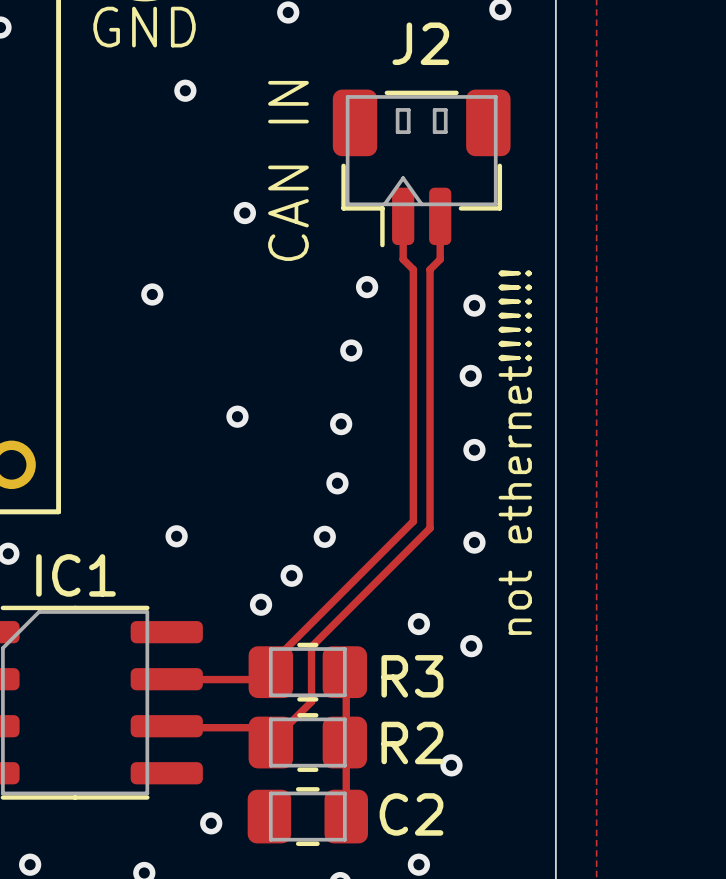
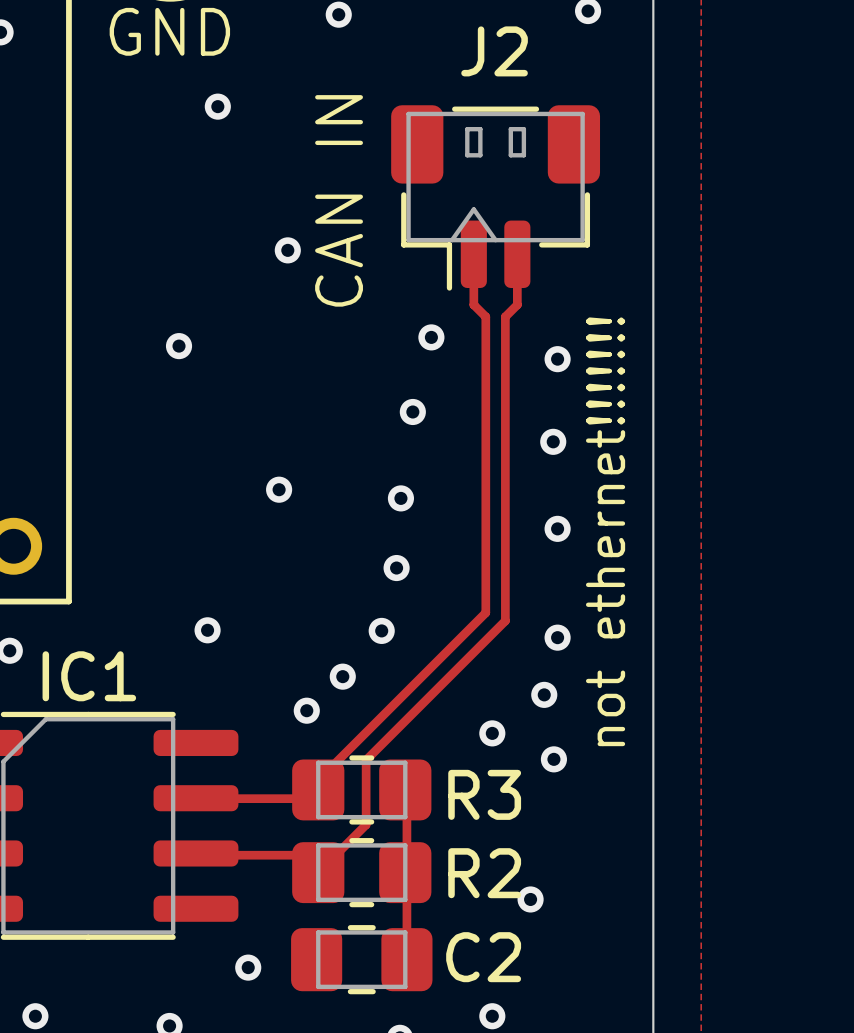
via: none -> (544, 694)

